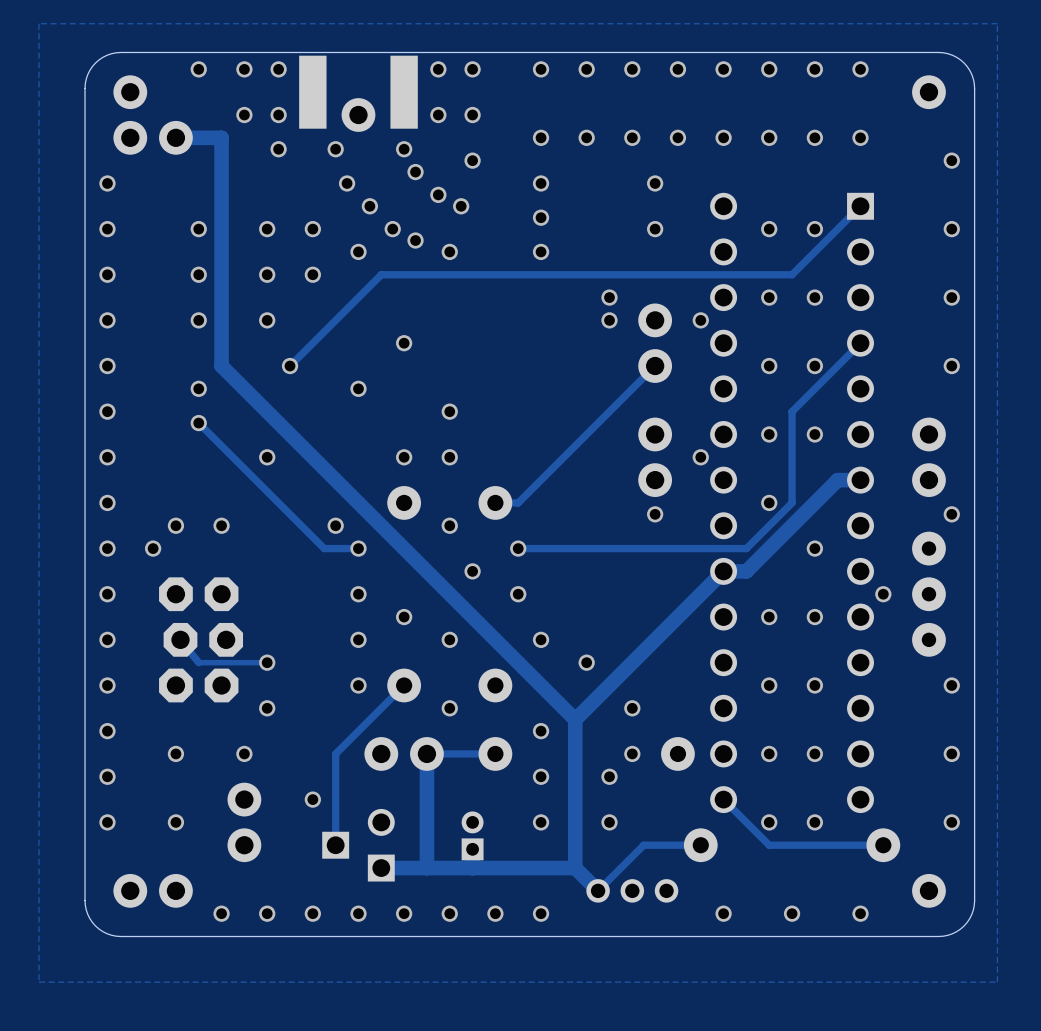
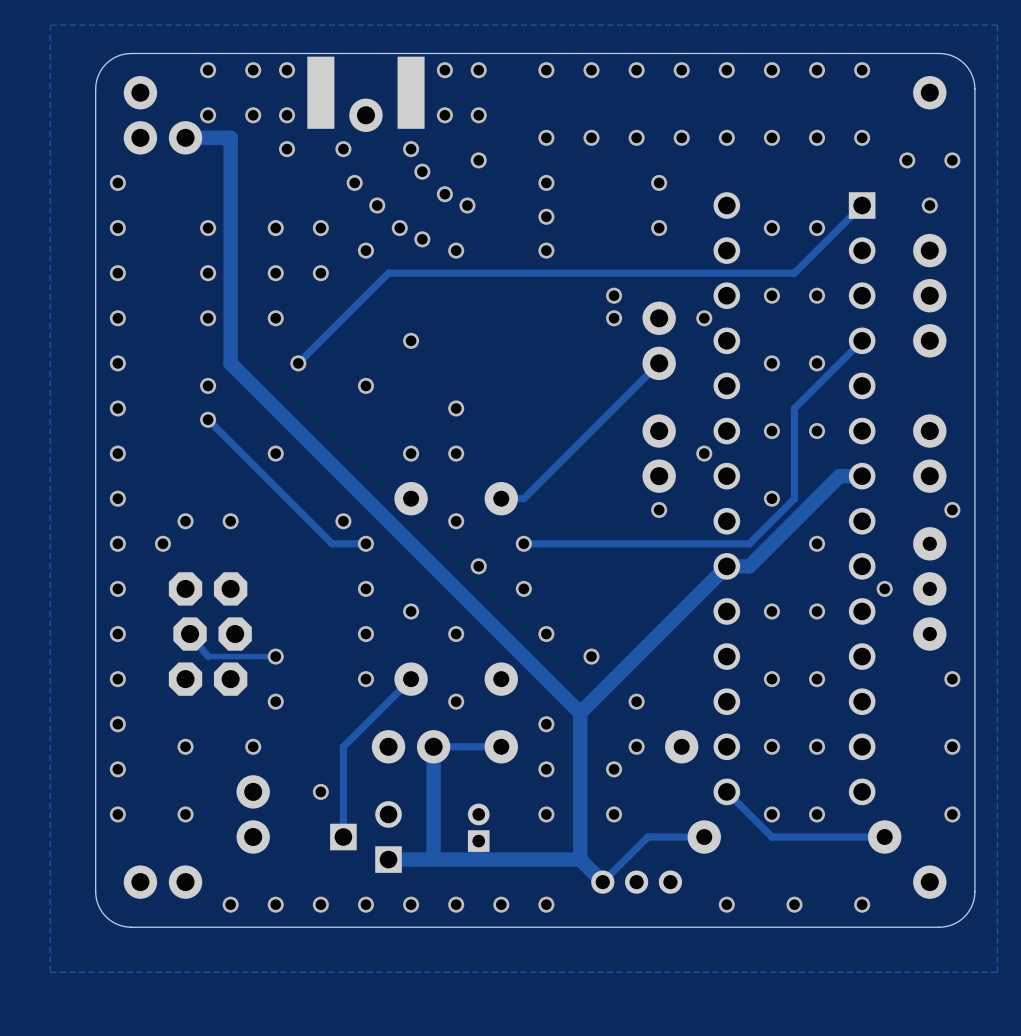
via: none -> (208, 115)
via: none -> (907, 160)
via position: (951, 229) -> (929, 205)
part: none -> (929, 250)
part: none -> (929, 295)
via: (951, 297) -> none
part: none -> (929, 340)
via: (951, 366) -> none

